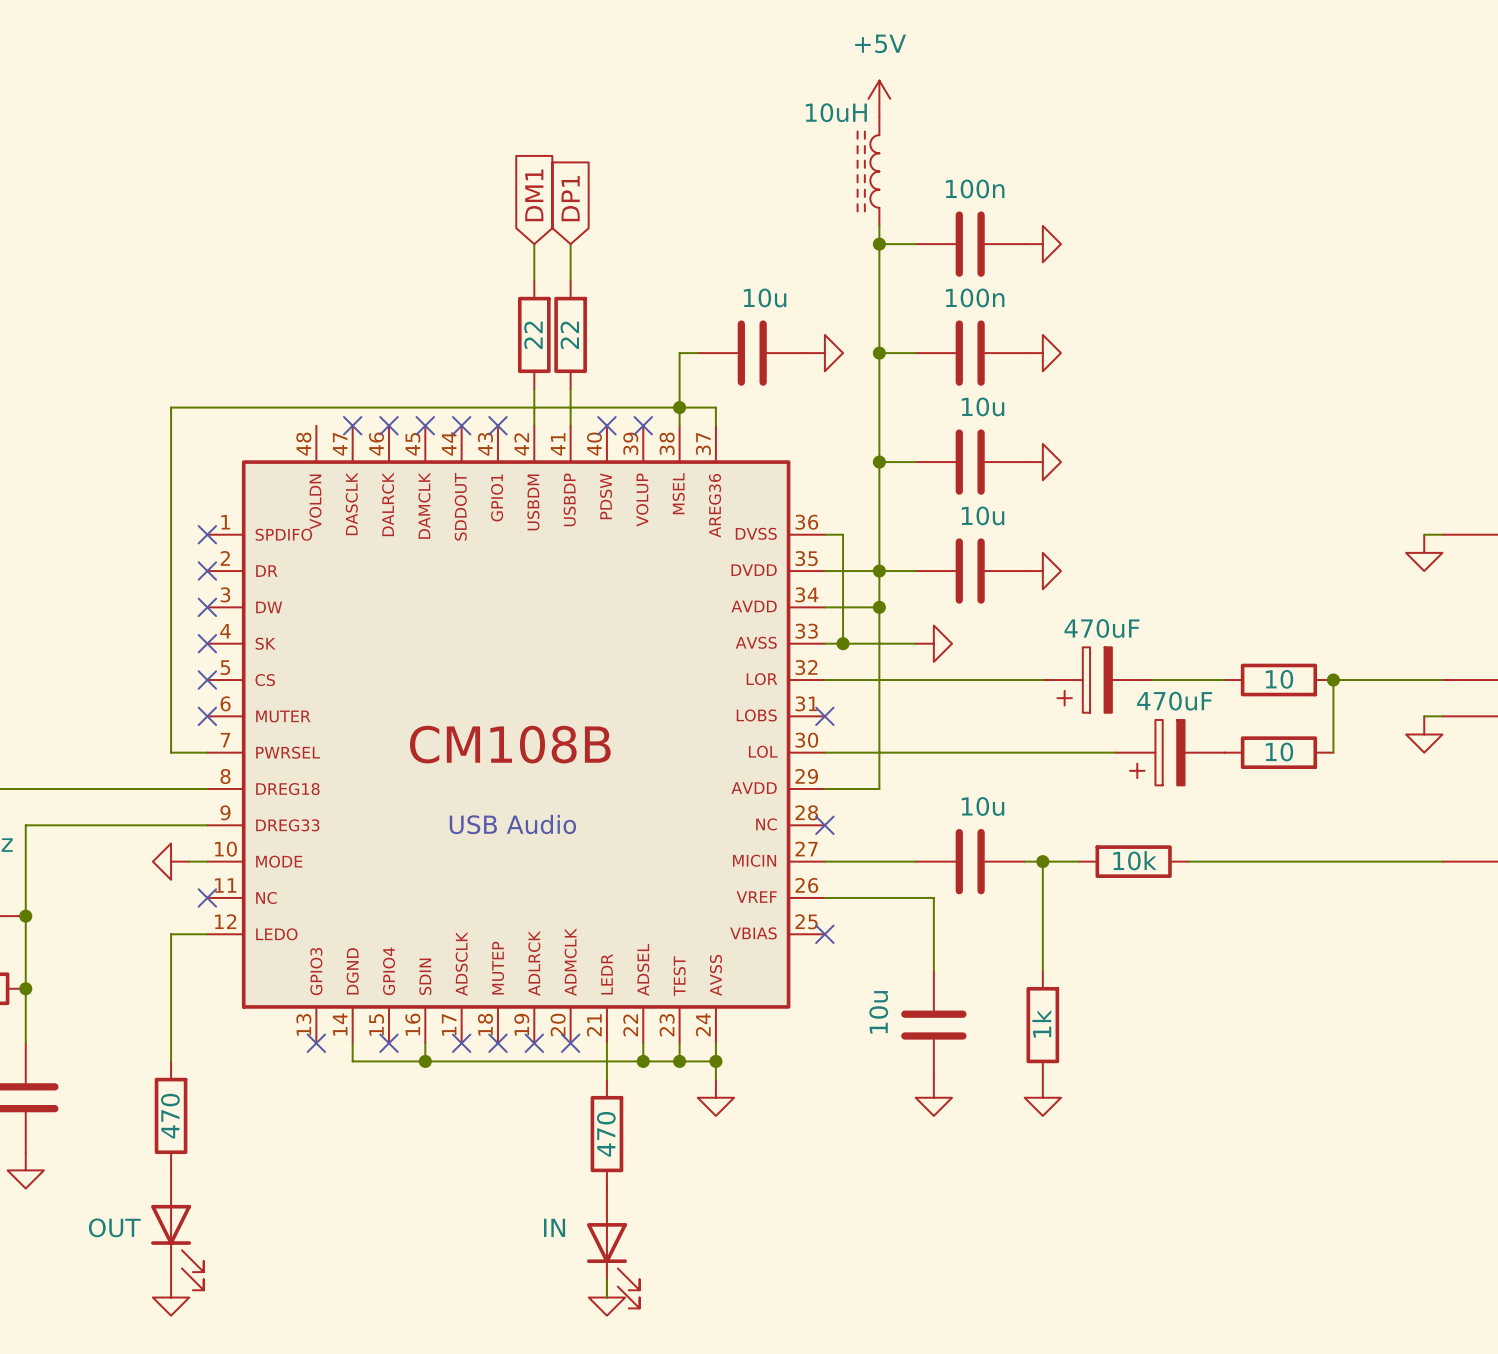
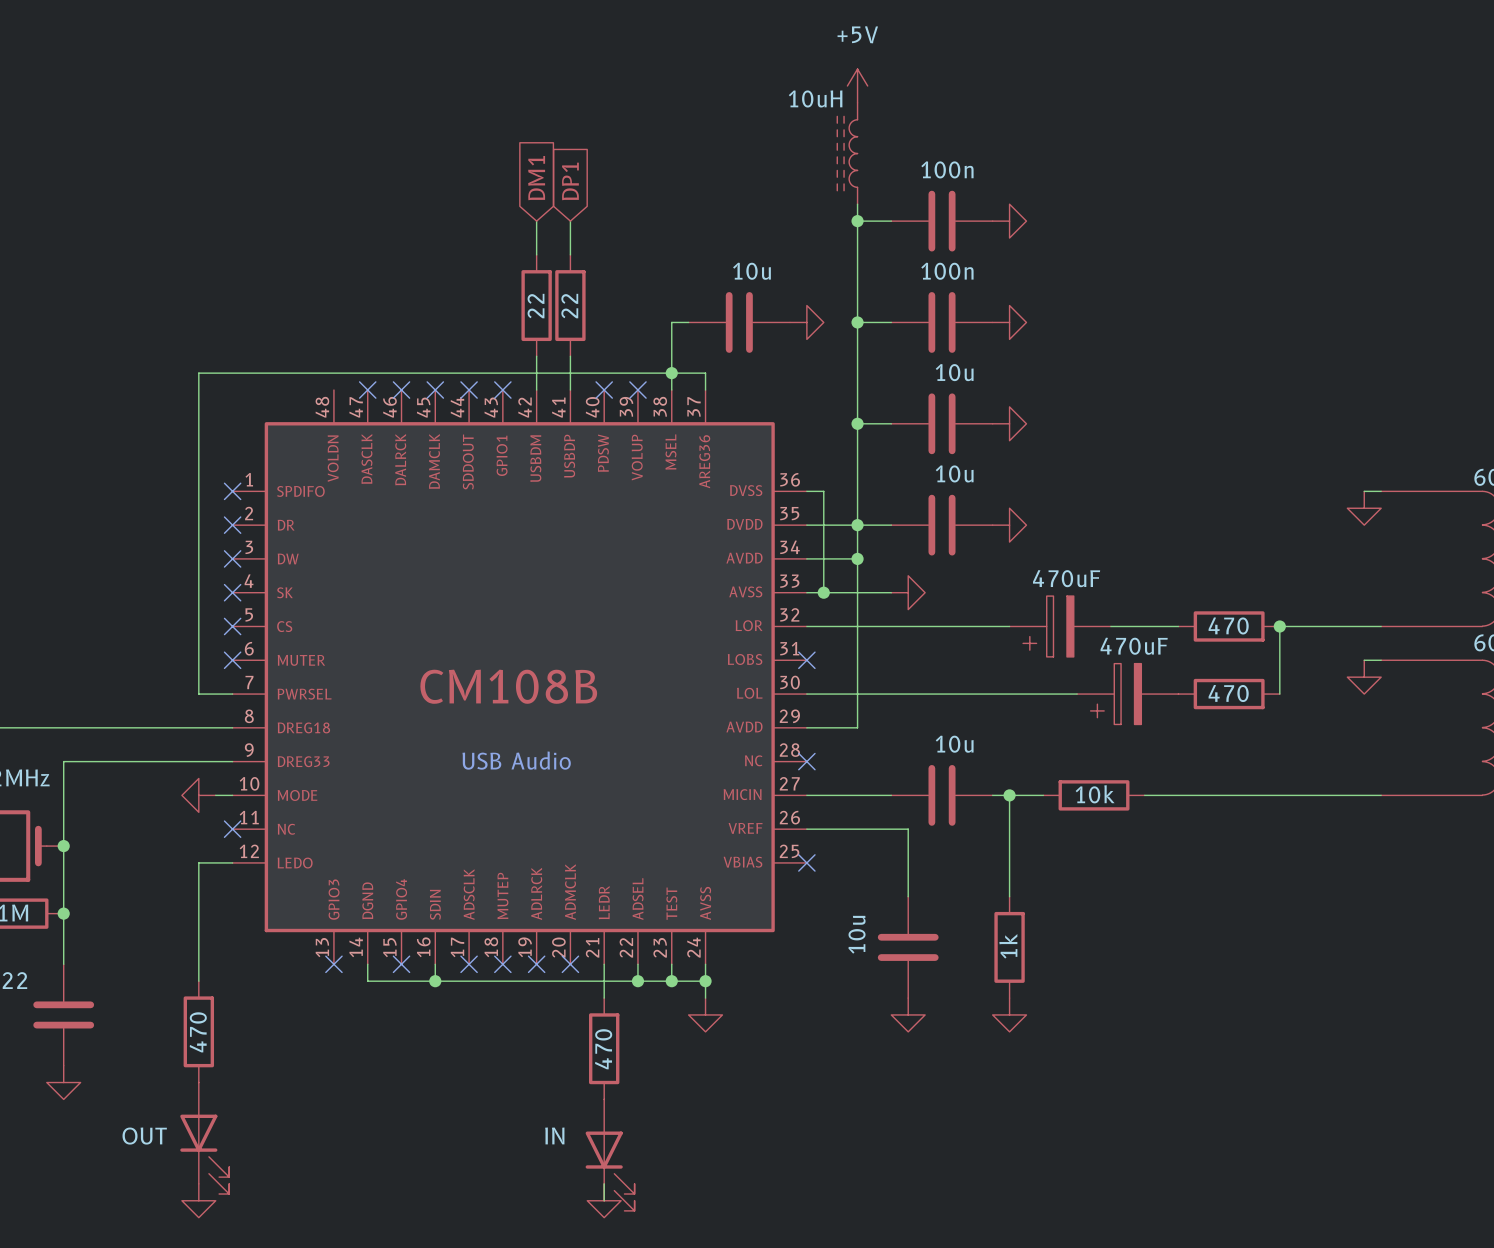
part value: 10 (1279, 679) -> 470 (1228, 625)
part value: 10 (1279, 752) -> 470 (1228, 693)

